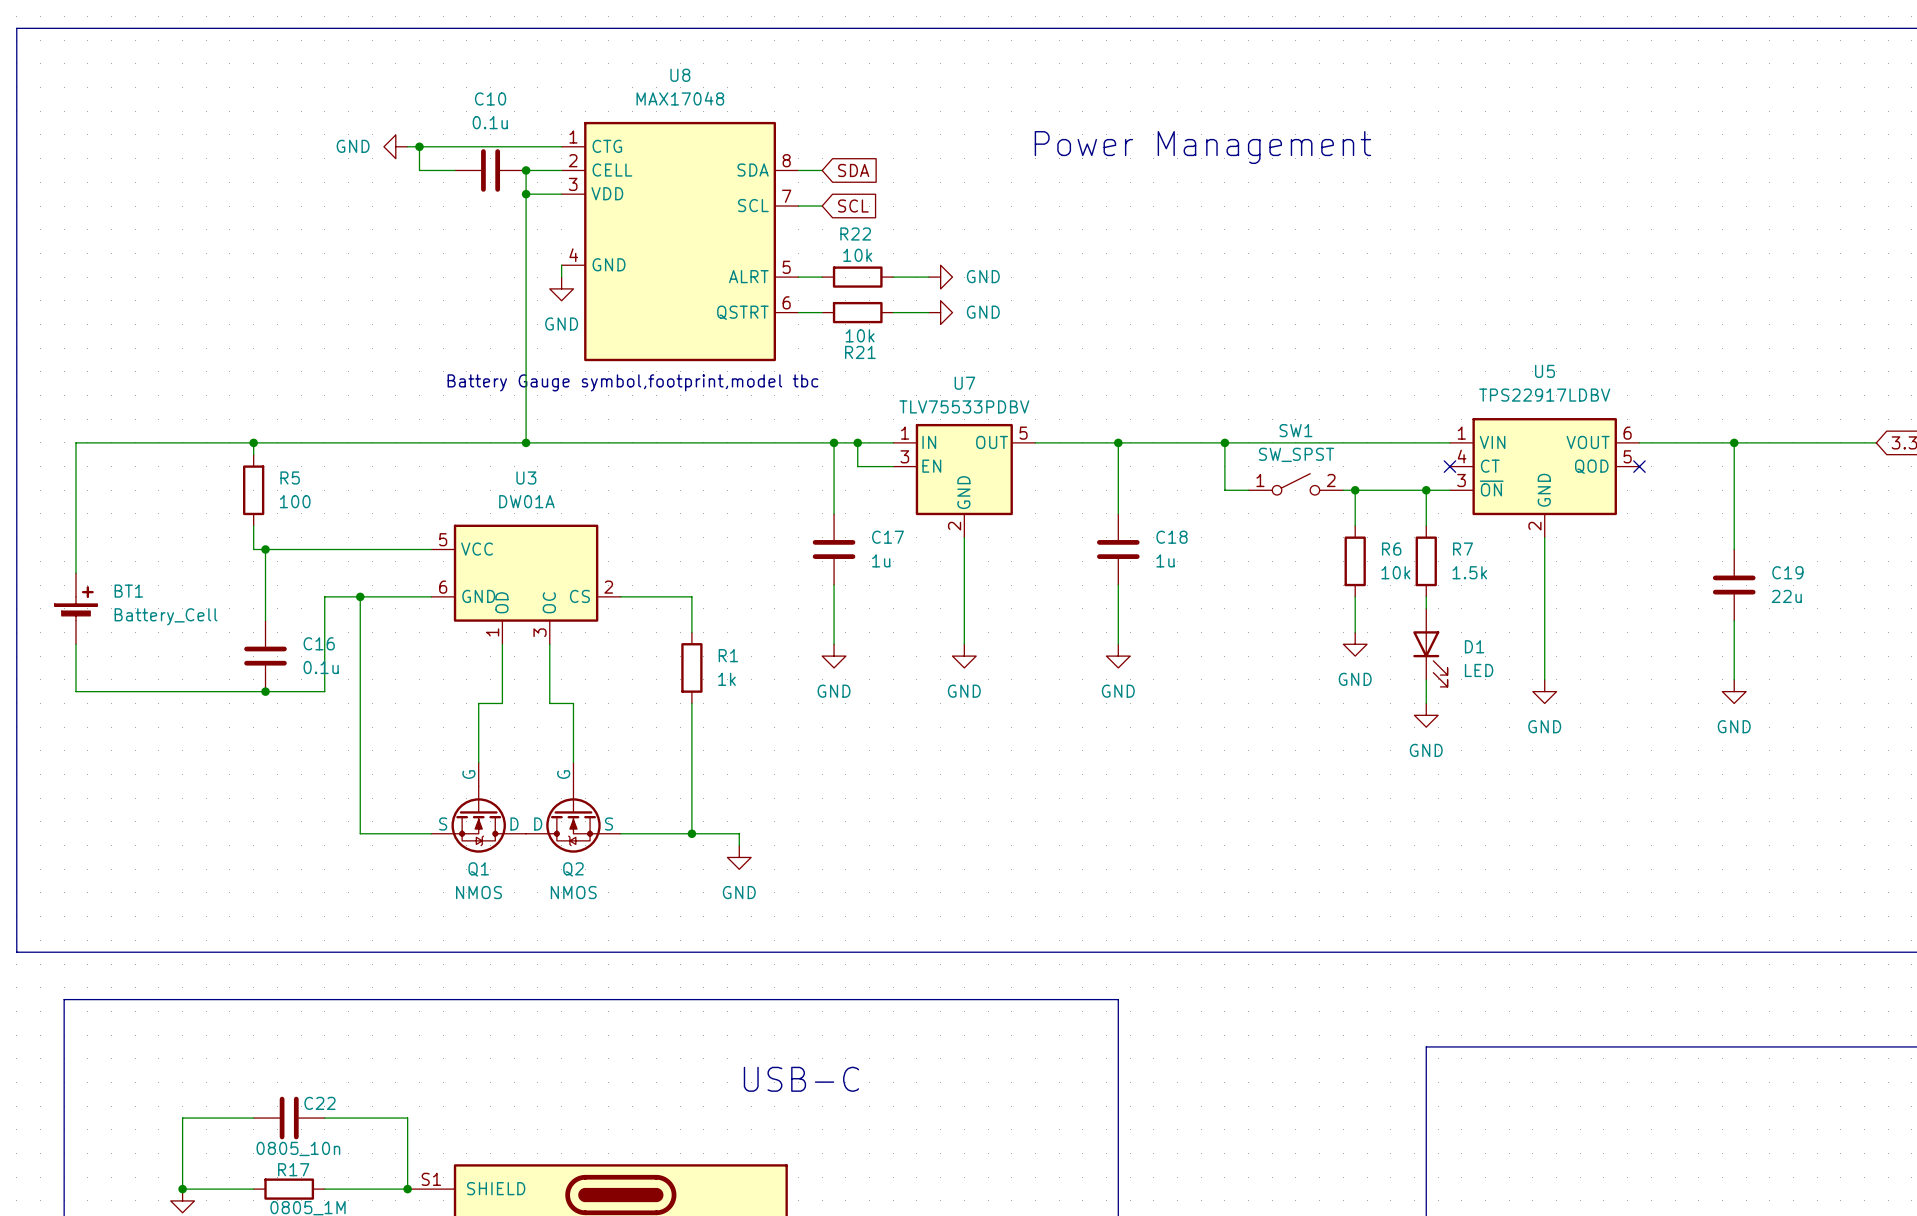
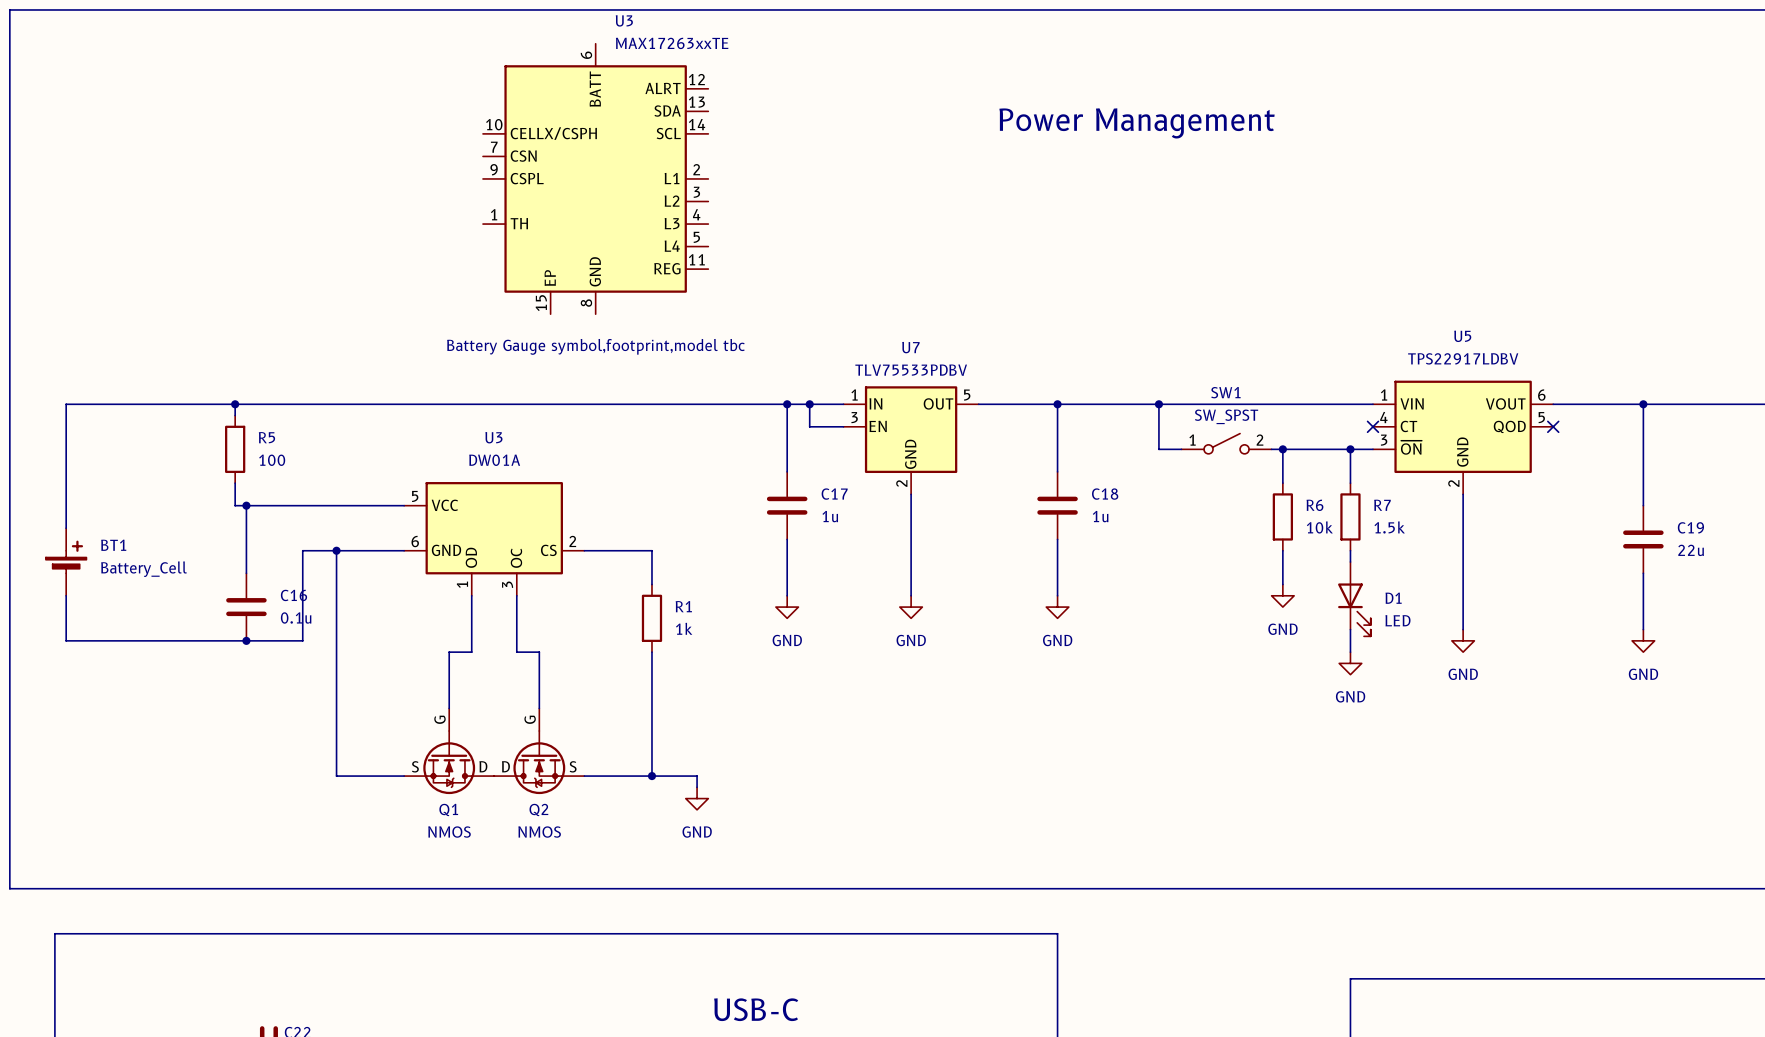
power symbol: GND (395, 146) -> none
wire: (407, 146) (561, 146) -> none
wire: (419, 146) (419, 170) (455, 170) -> none
junction: (419, 146) -> none
C10: 0.1u (490, 170) -> none
junction: (526, 170) -> none
wire: (561, 170) (526, 170) (526, 442) -> none
wire: (798, 170) (822, 170) -> none
global label: SDA (853, 170) -> none
junction: (526, 194) -> none
U3: none -> MAX17263xxTE (595, 178)
wire: (798, 206) (822, 206) -> none
global label: SCL (853, 206) -> none
U8: MAX17048 (680, 241) -> none
wire: (798, 277) (822, 277) -> none
R22: 10k (857, 277) -> none
wire: (893, 277) (928, 277) -> none
power symbol: GND (940, 277) -> none
power symbol: GND (561, 288) -> none
wire: (798, 312) (822, 312) -> none
R21: 10k (857, 312) -> none
wire: (893, 312) (928, 312) -> none
power symbol: GND (940, 312) -> none
junction: (526, 442) -> none

